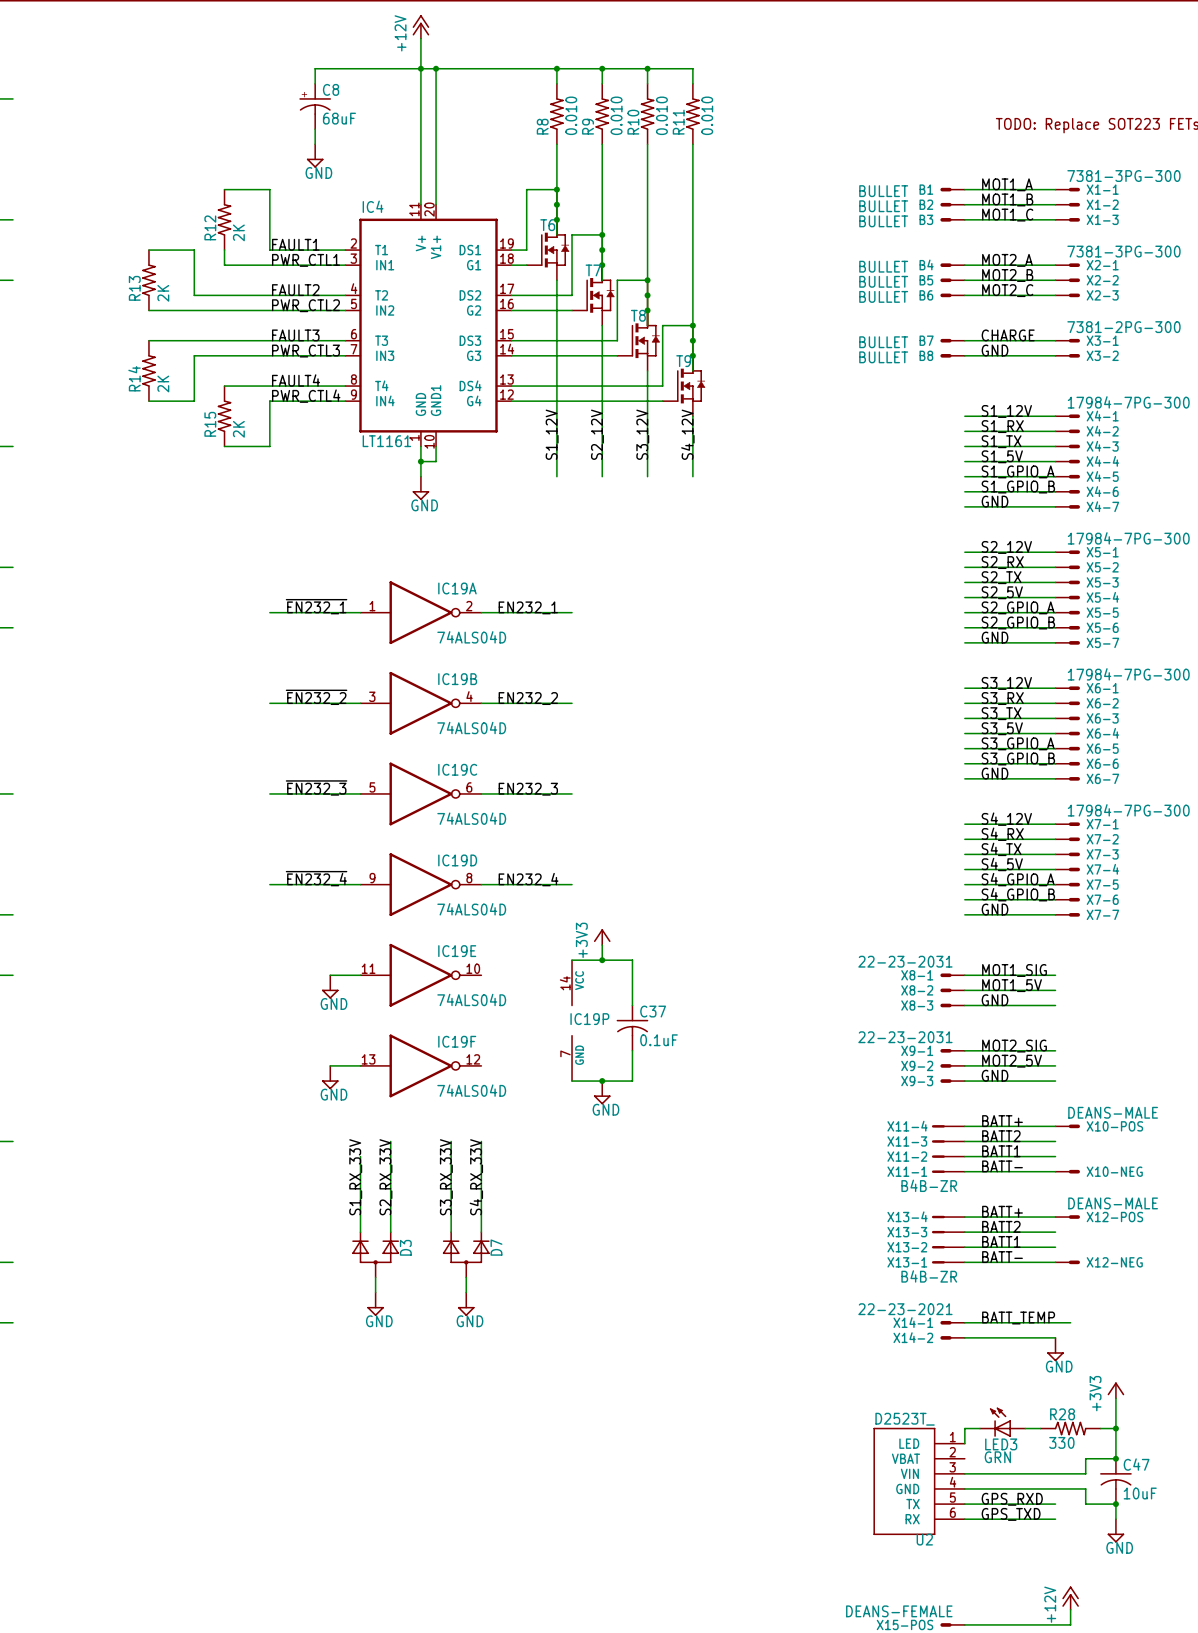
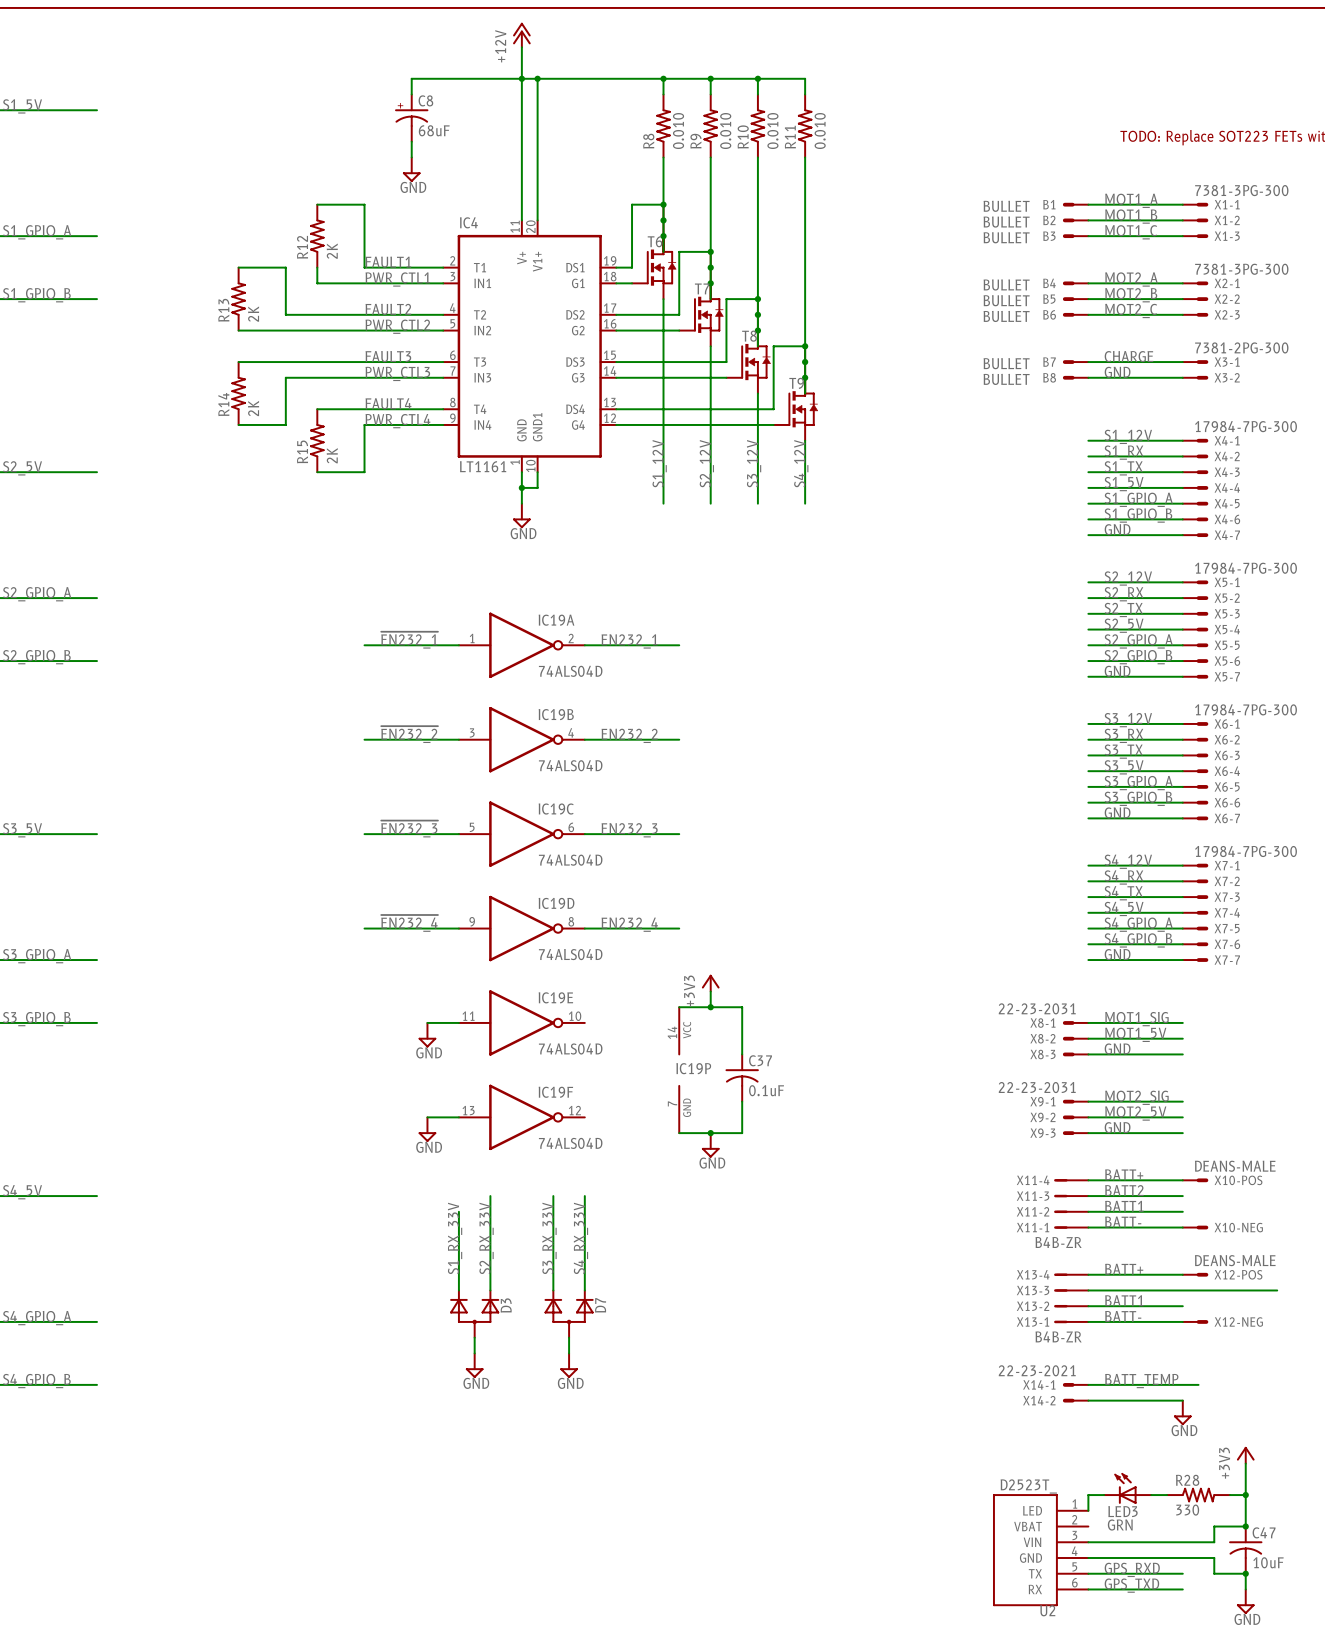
label: BATT2 (1001, 1226) -> none
wire: none -> (1182, 1290) (1277, 1290)

